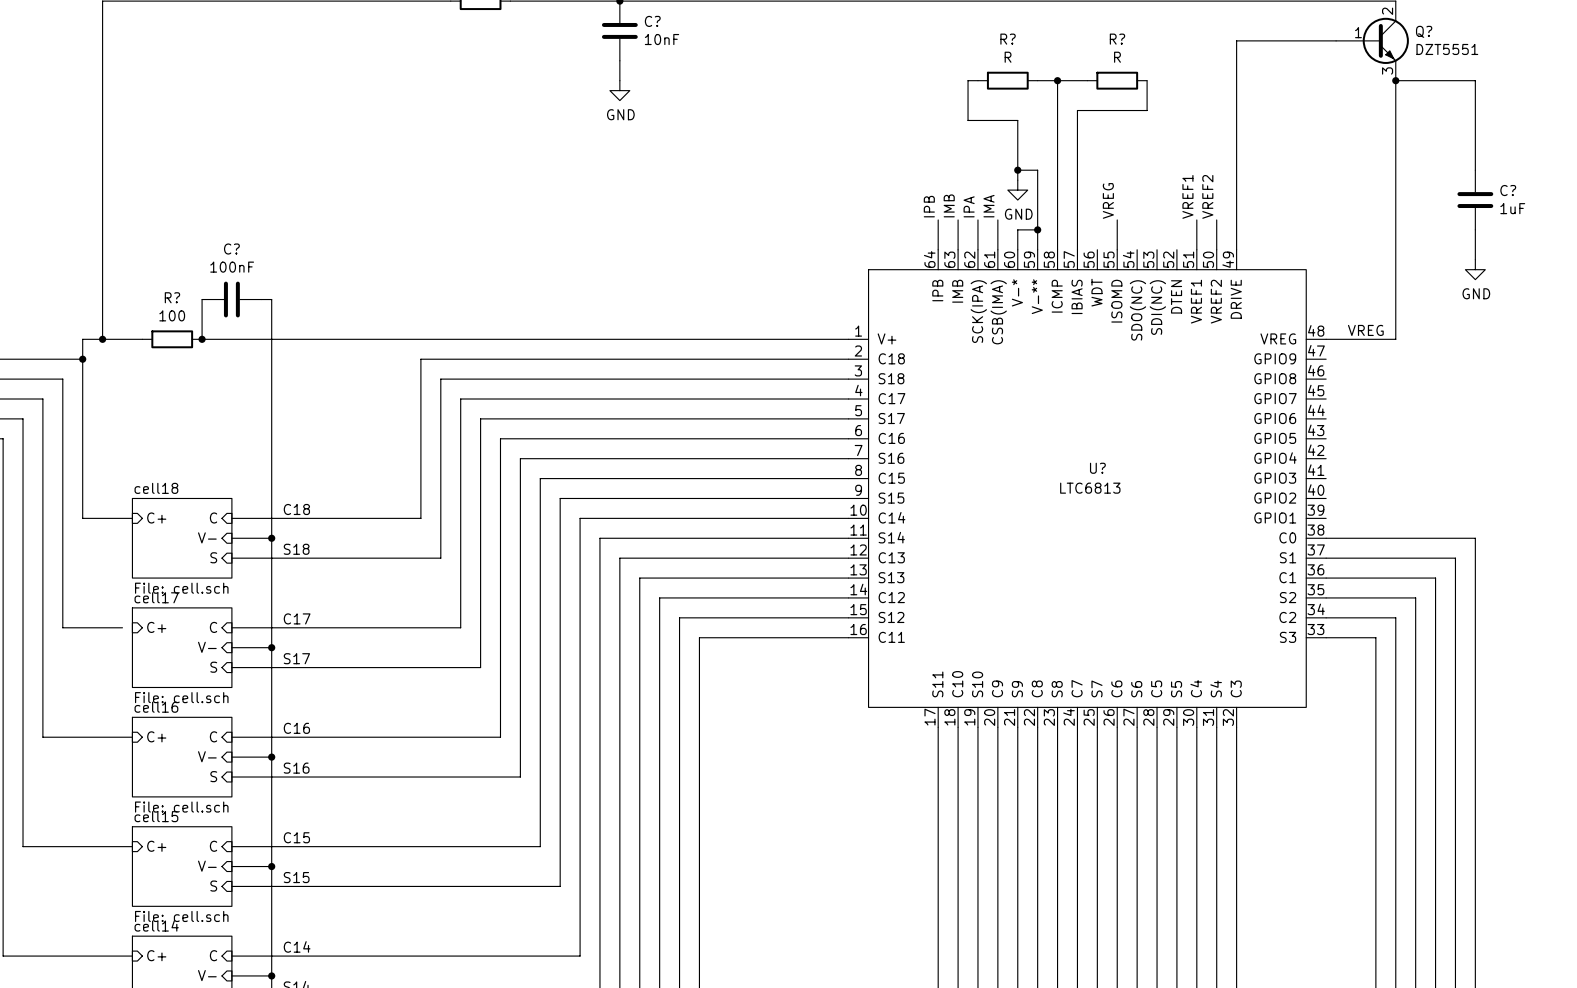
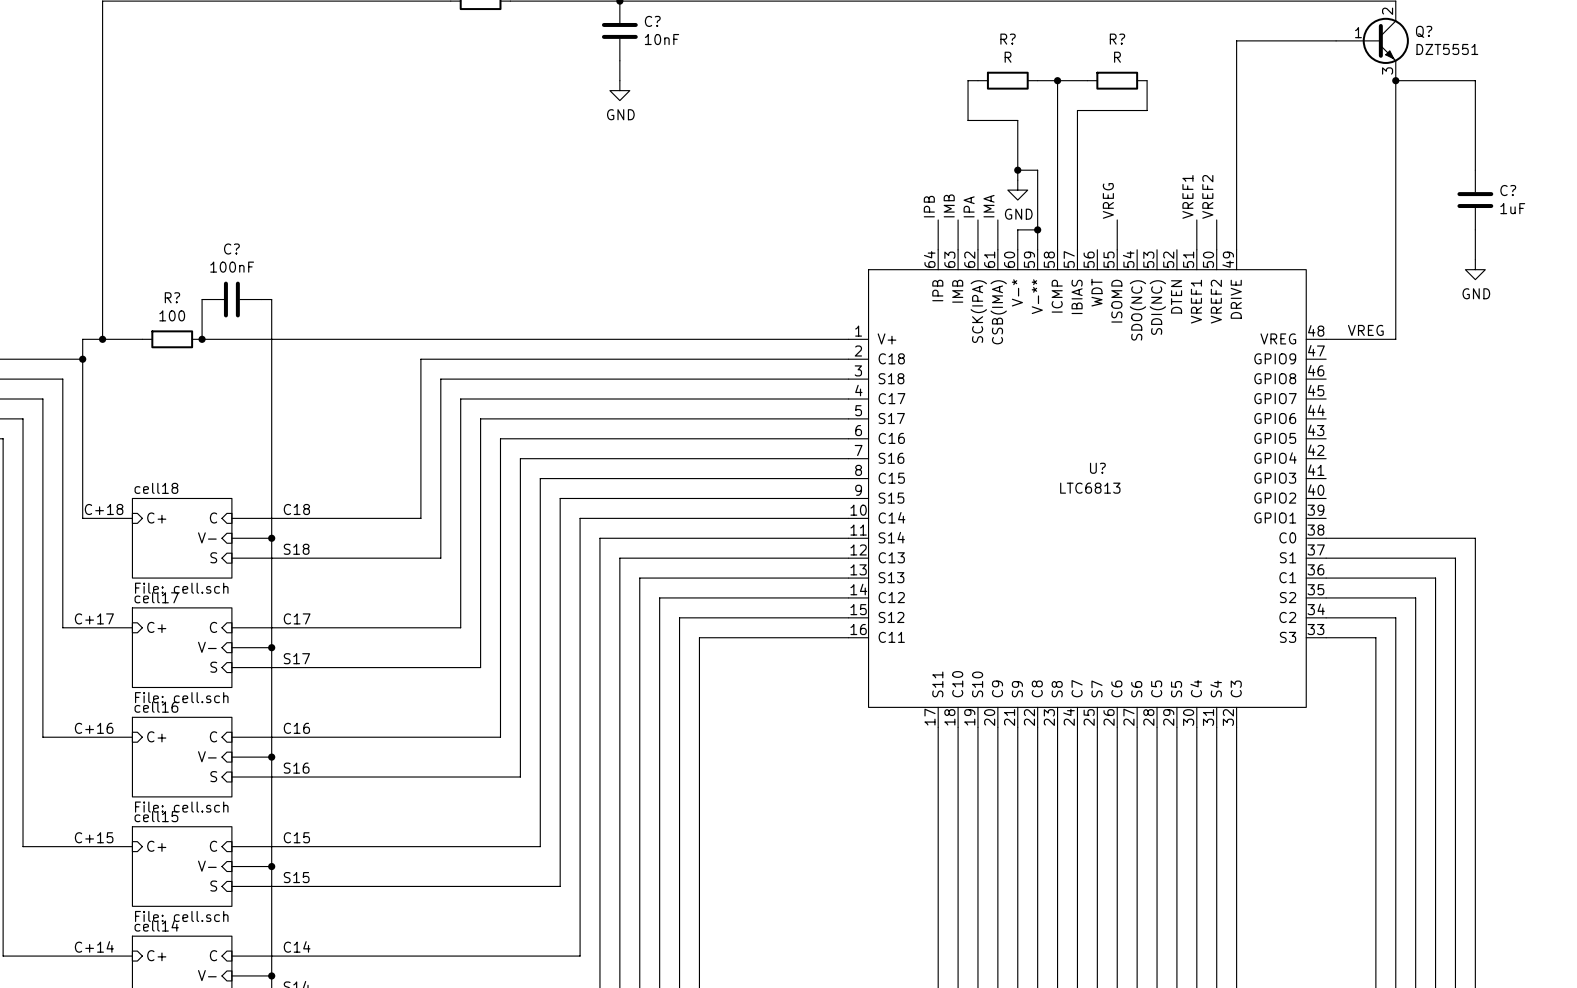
label: none -> C+18 (104, 509)
label: none -> C+17 (94, 618)
wire: none -> (122, 627) (132, 627)
label: none -> C+16 (94, 728)
label: none -> C+15 (94, 837)
label: none -> C+14 (94, 946)

